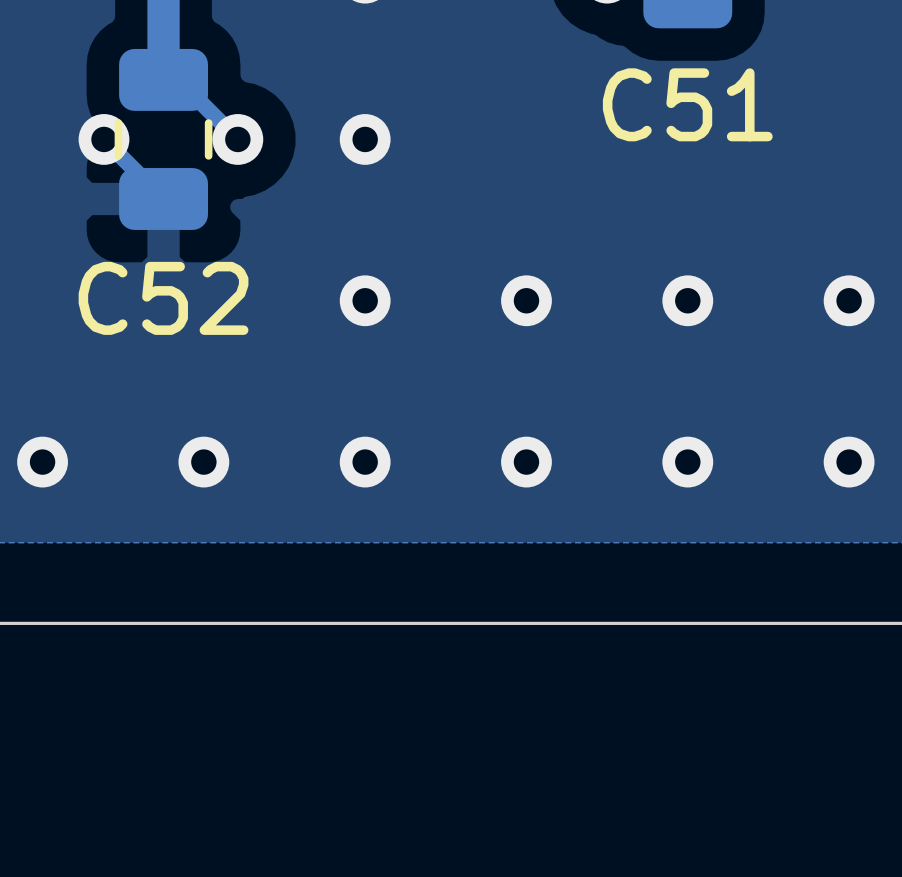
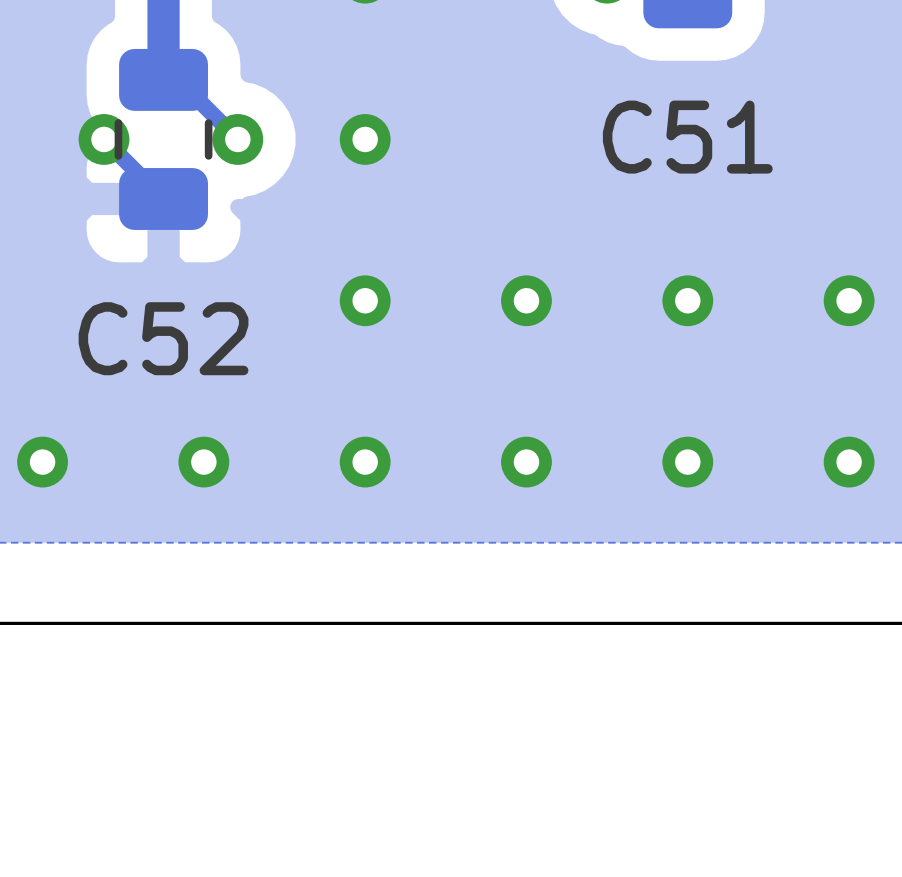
C51 name position: C51 (687, 104) -> C51 (687, 137)
C52 name position: C52 (163, 298) -> C52 (163, 338)

